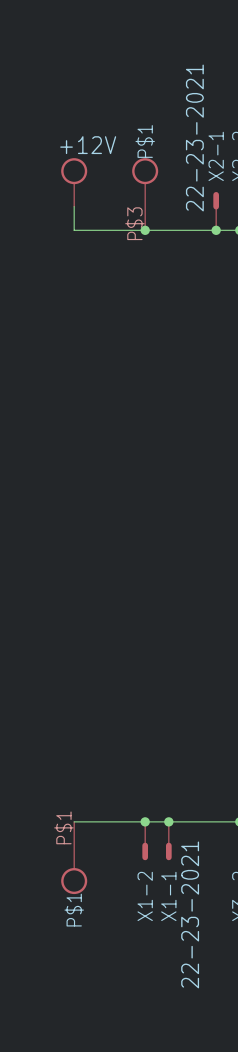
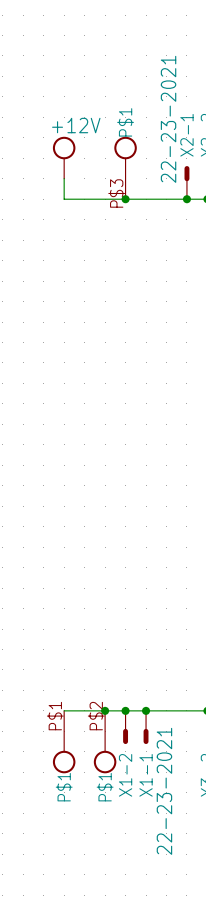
junction: none -> (105, 710)
part: none -> (105, 742)

